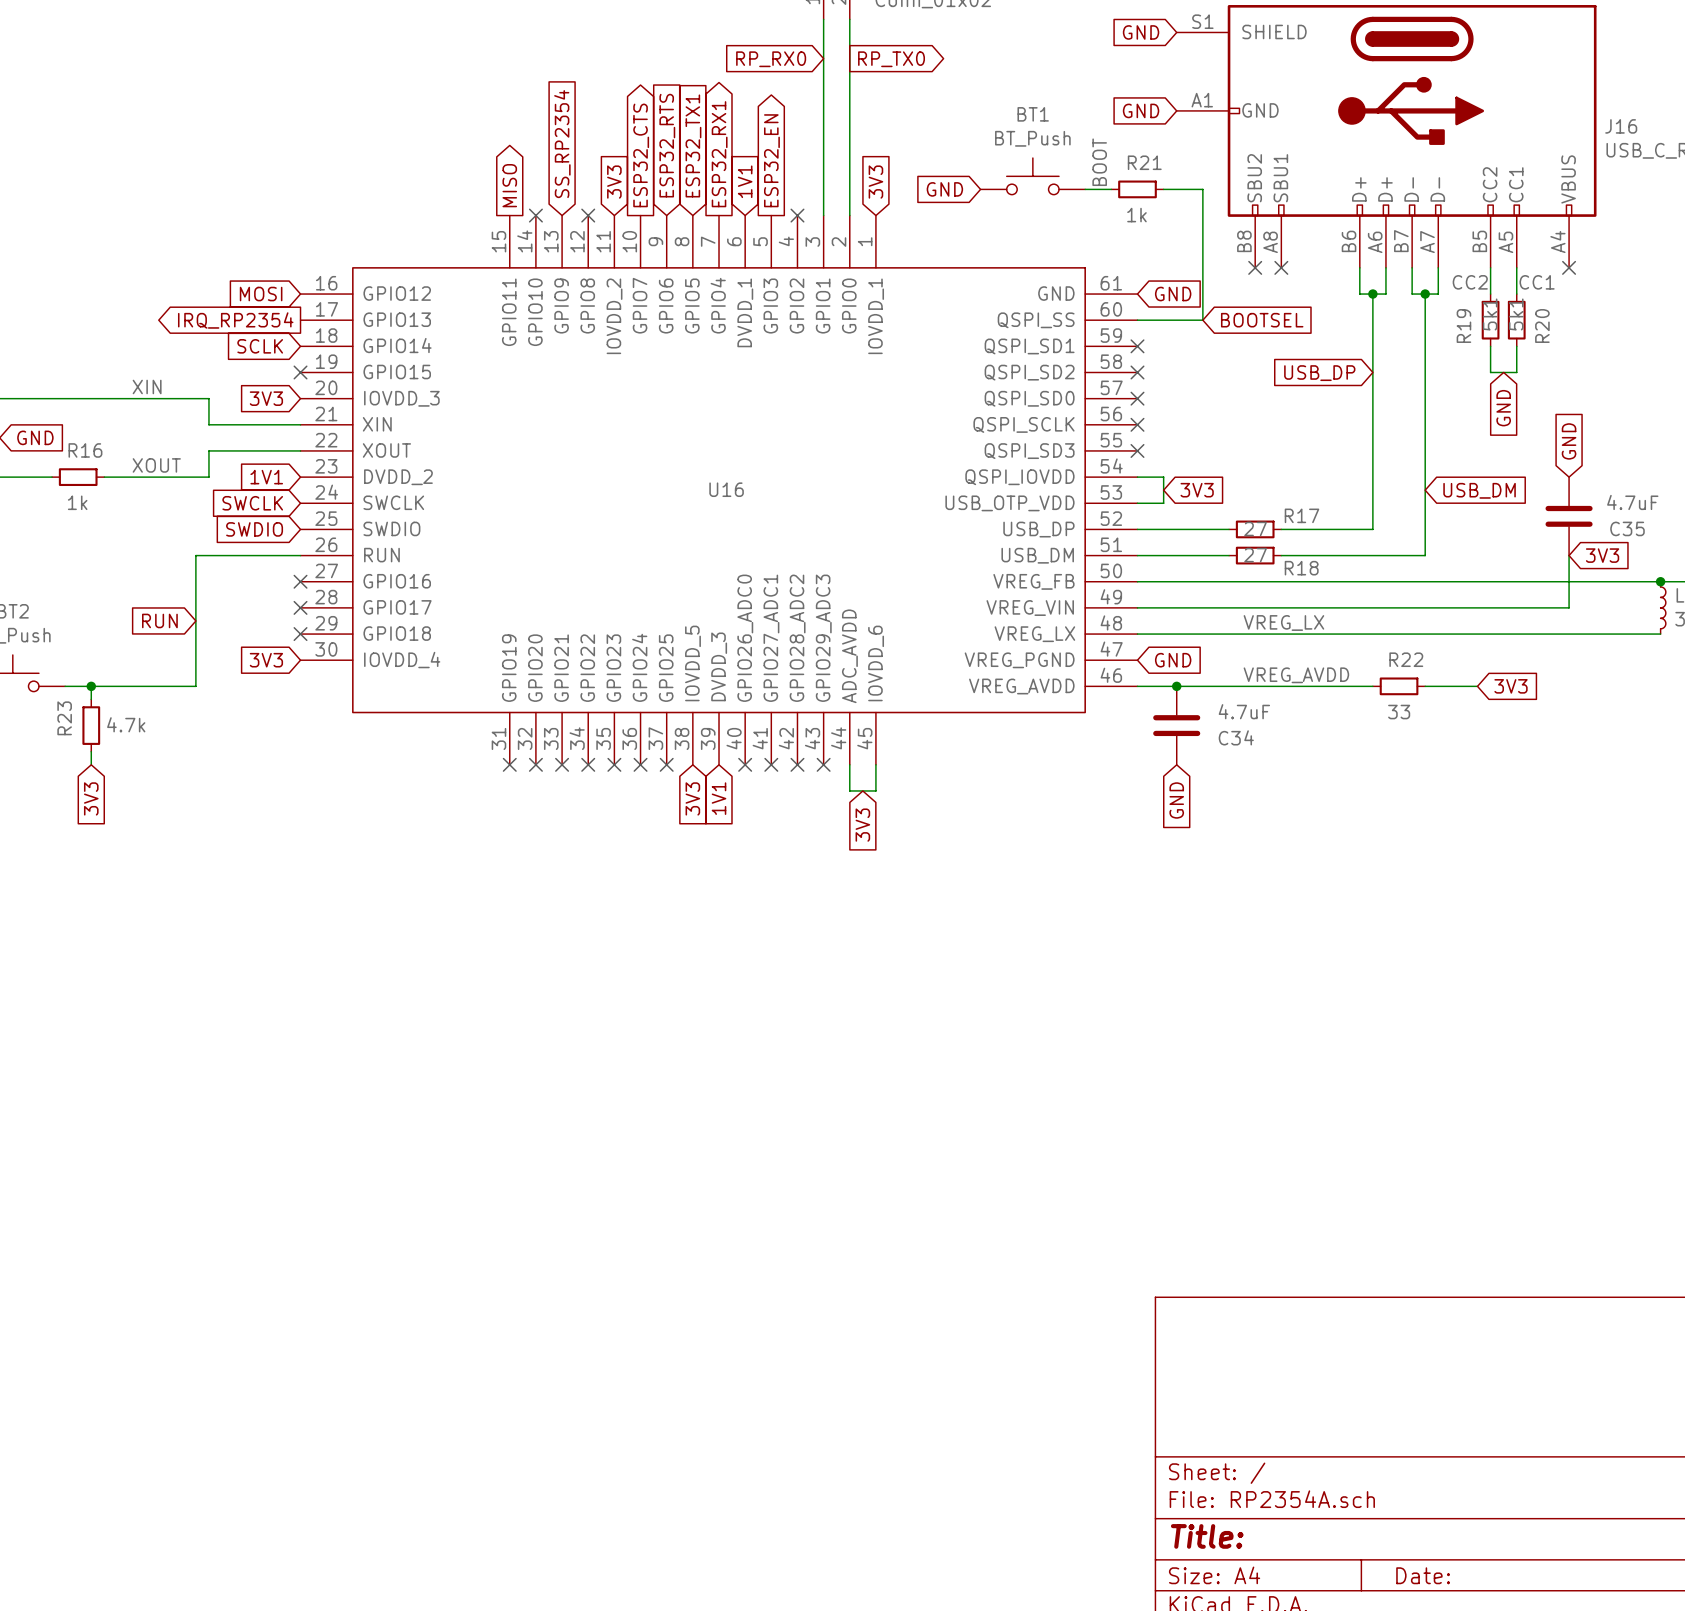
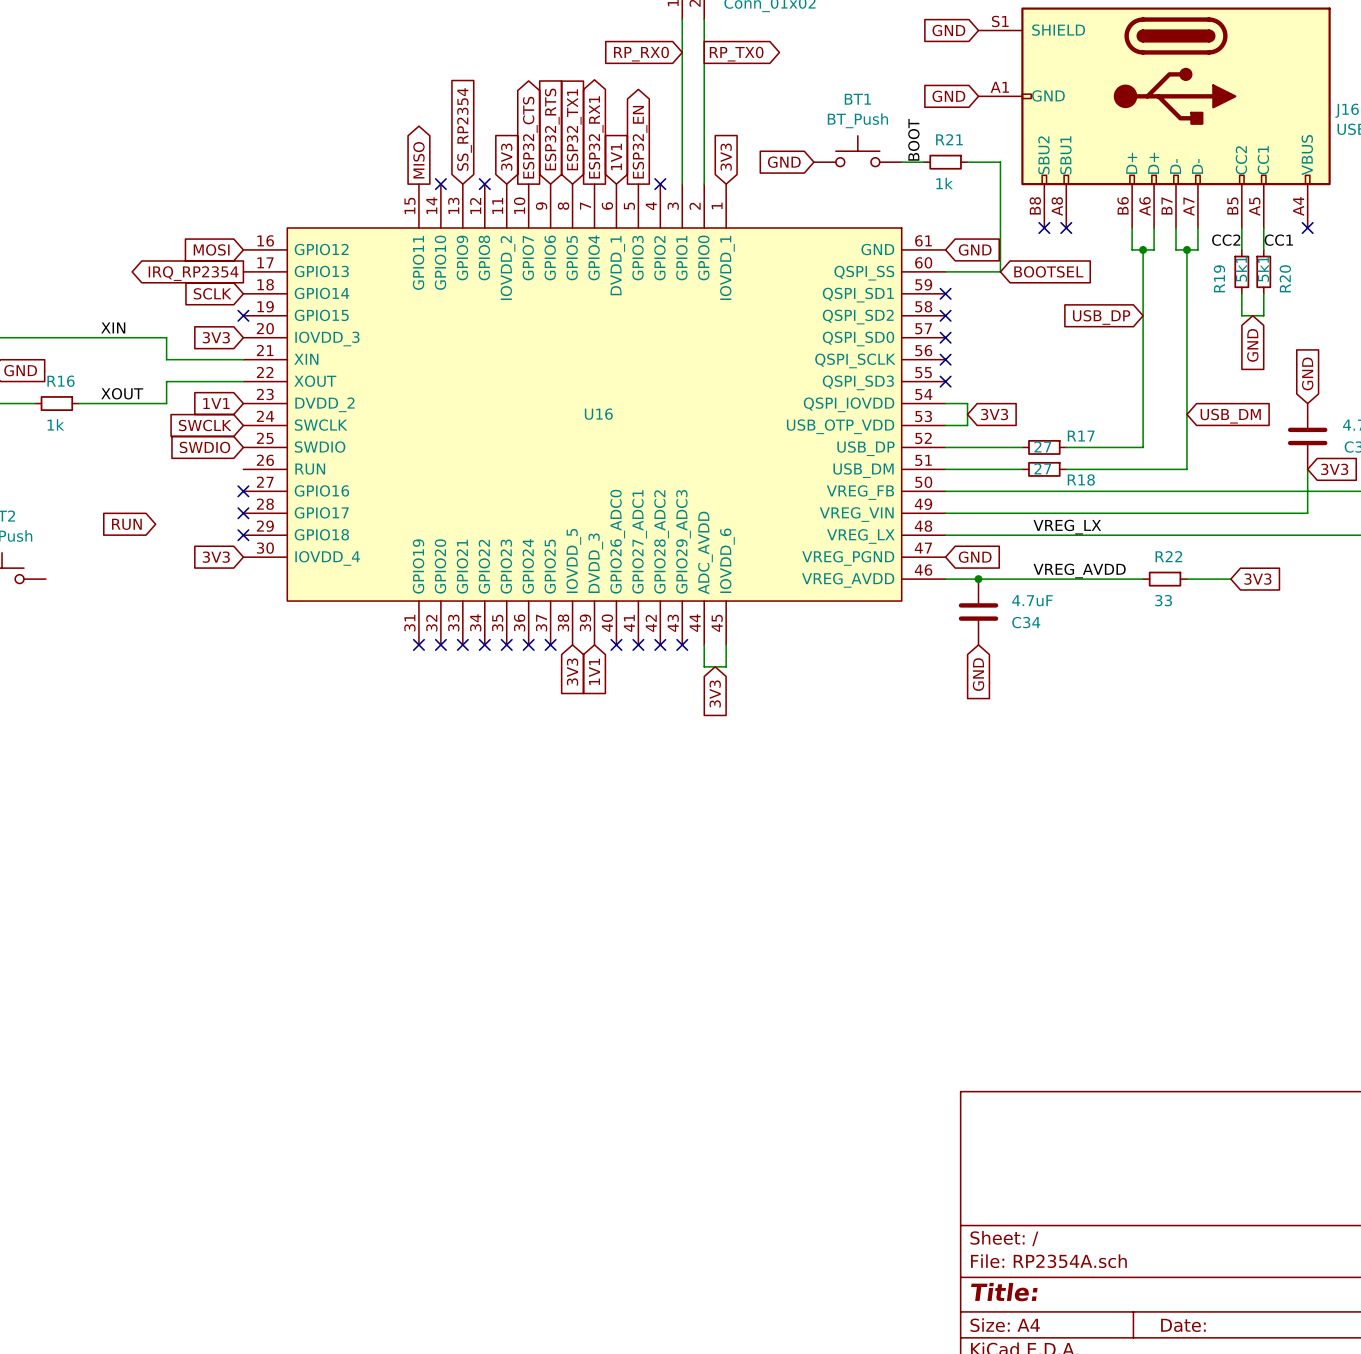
wire: (300, 555) (195, 555) (195, 686) (65, 686) -> none
wire: (91, 686) (91, 699) -> none
junction: (91, 686) -> none
R23: 4.7k (91, 725) -> none
wire: (91, 751) (91, 764) -> none
global label: 3V3 (91, 798) -> none

